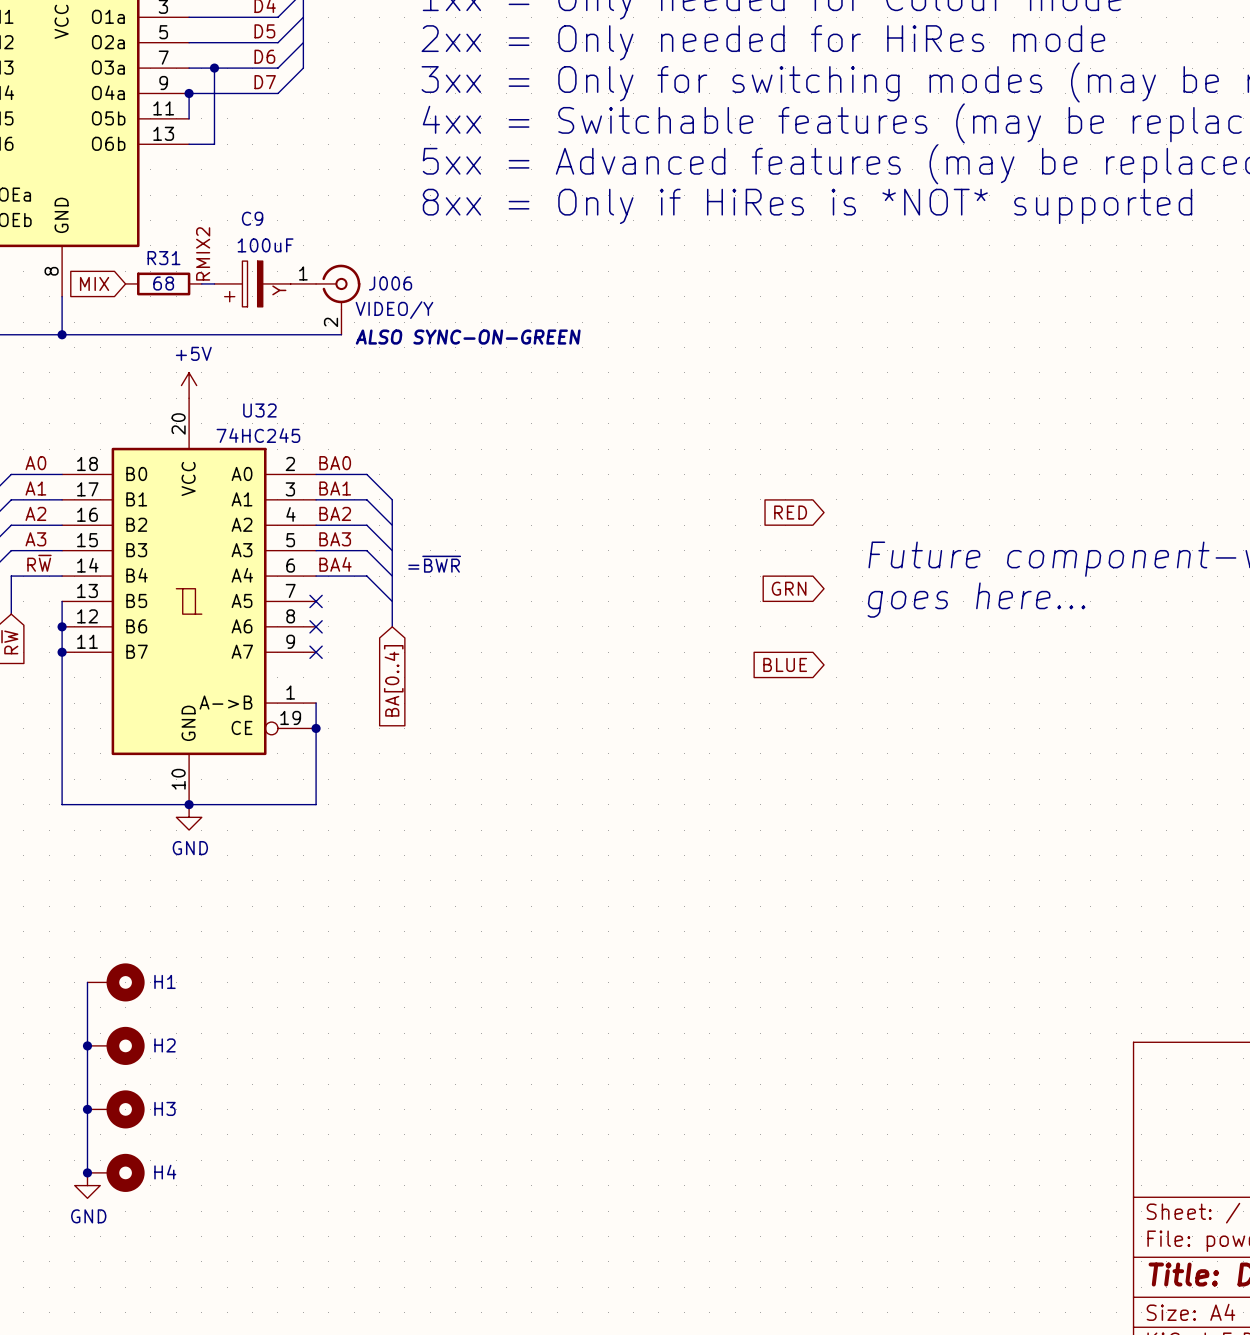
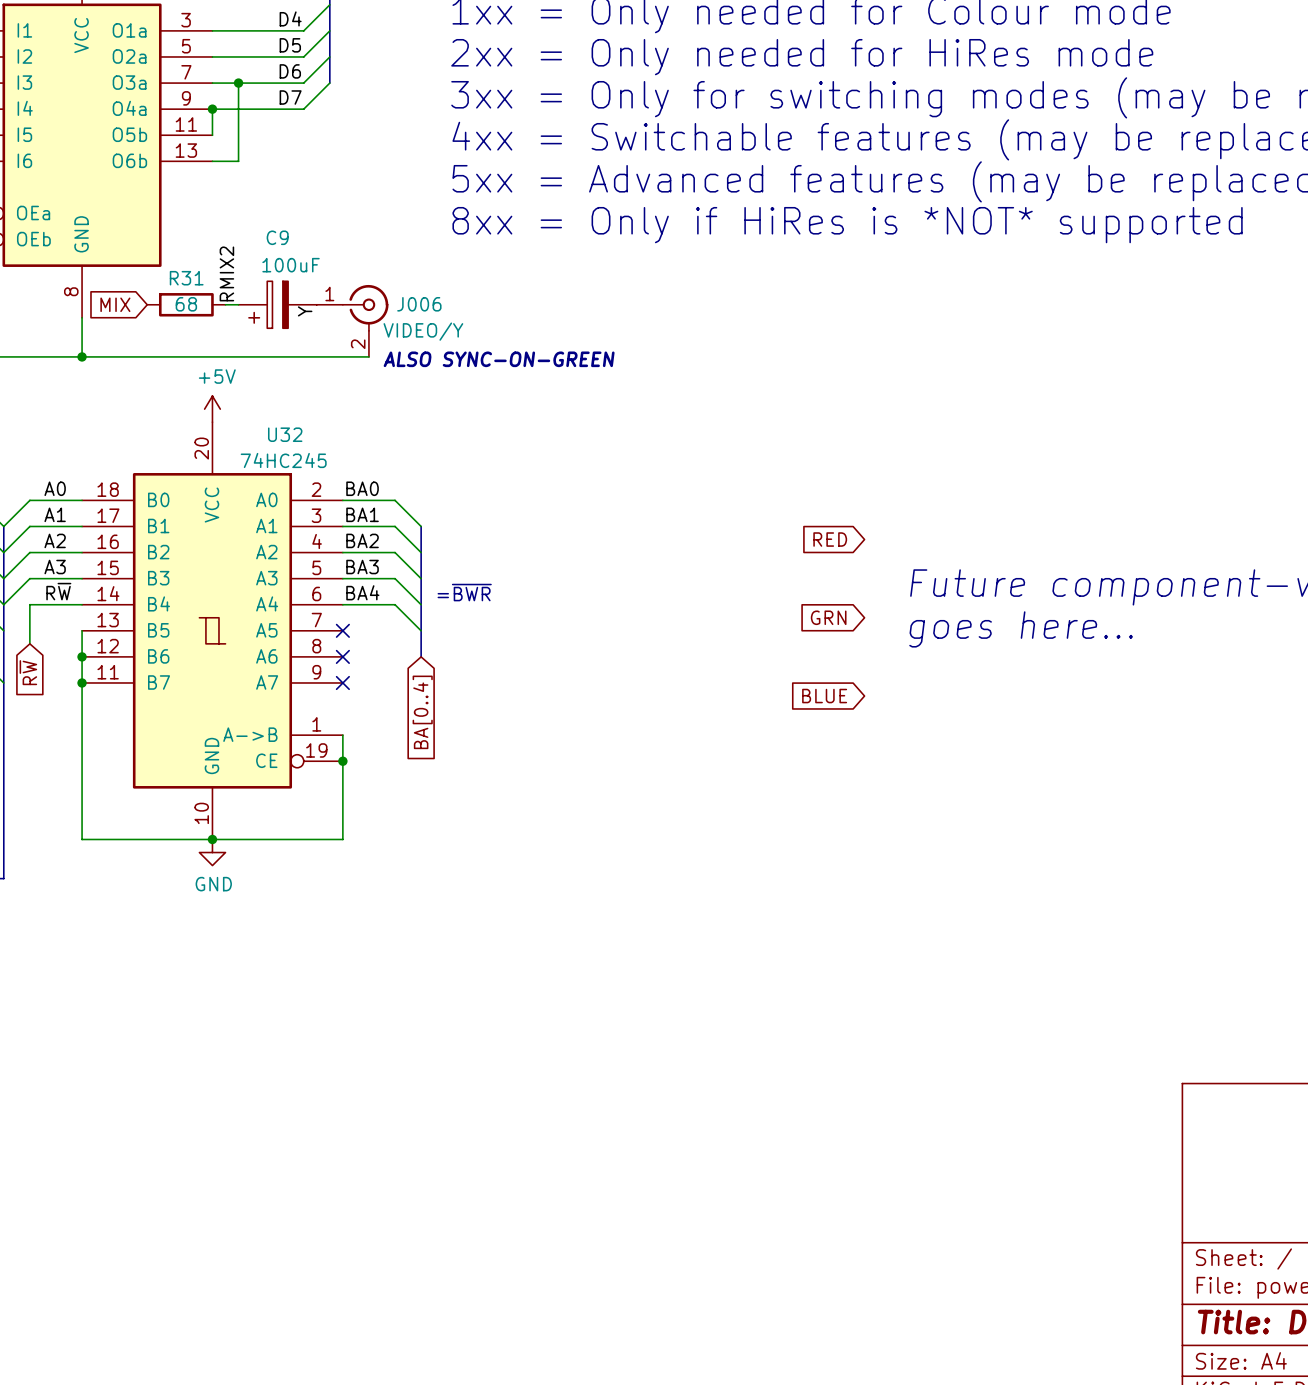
wire: (87, 982) (87, 1172) -> none
H1: (116, 982) -> none
junction: (87, 1045) -> none
H2: (116, 1045) -> none
junction: (87, 1109) -> none
H3: (116, 1109) -> none
junction: (87, 1172) -> none
H4: (116, 1172) -> none
power symbol: GND (87, 1185) -> none

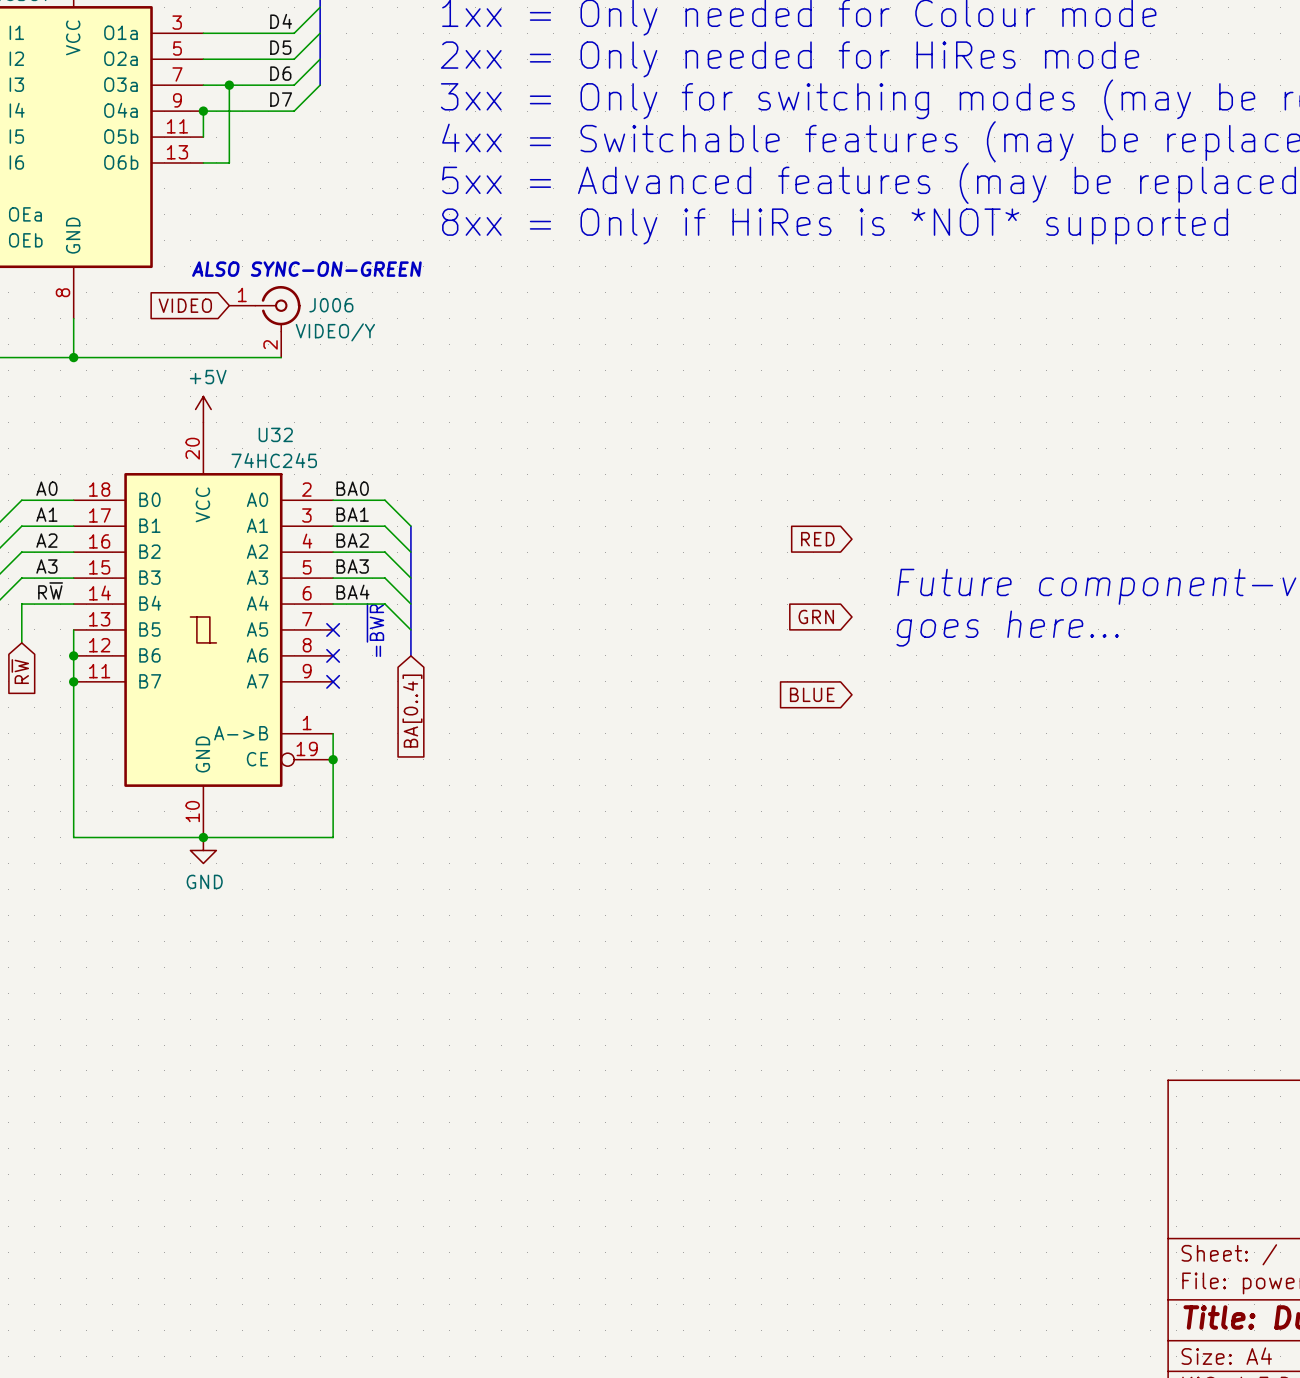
label: RMIX2 (226, 273) -> none
global label: MIX (115, 304) -> none
R31: 68 (186, 304) -> none
global label: none -> VIDEO (185, 305)
wire: (225, 304) (238, 304) -> none
C9: 100uF (277, 304) -> none
label: Y (305, 311) -> none
J006 position: (352, 320) -> (265, 321)
wire: (290, 356) (368, 356) -> none
text position: ALSO SYNC-ON-GREEN (499, 359) -> ALSO SYNC-ON-GREEN (306, 269)
text rotation: 0° (464, 592) -> 90° counterclockwise (375, 630)
text position: =~{BWR} (464, 592) -> =~{BWR} (375, 630)

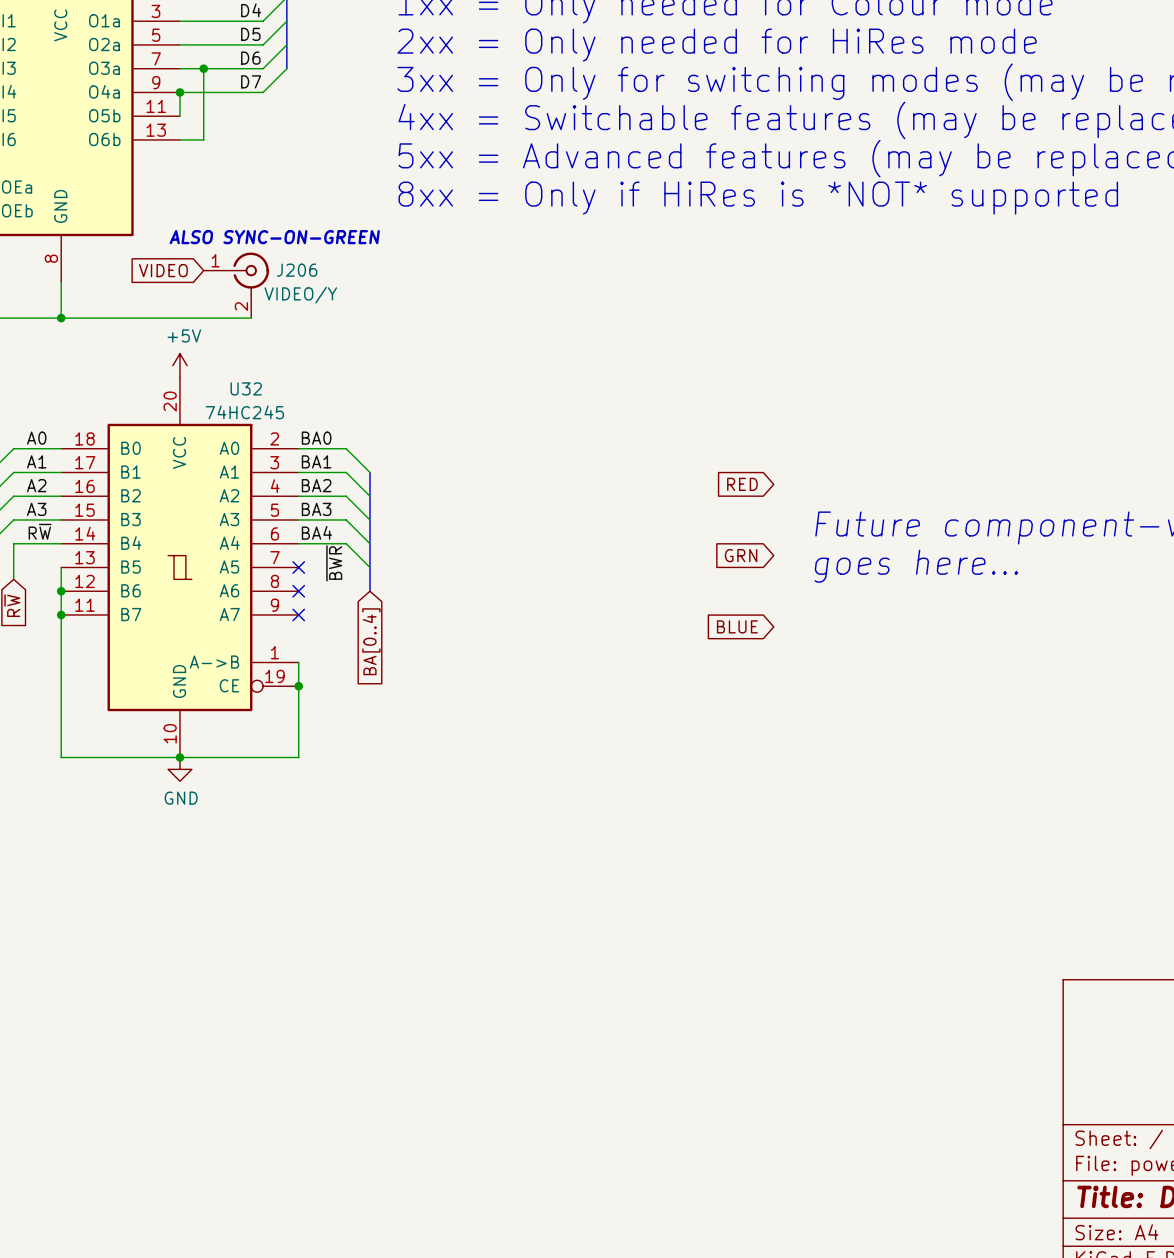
J006 name: J006 (331, 305) -> J206 (297, 270)
label: none -> ~{BWR} (334, 563)
text: =~{BWR} (375, 630) -> none

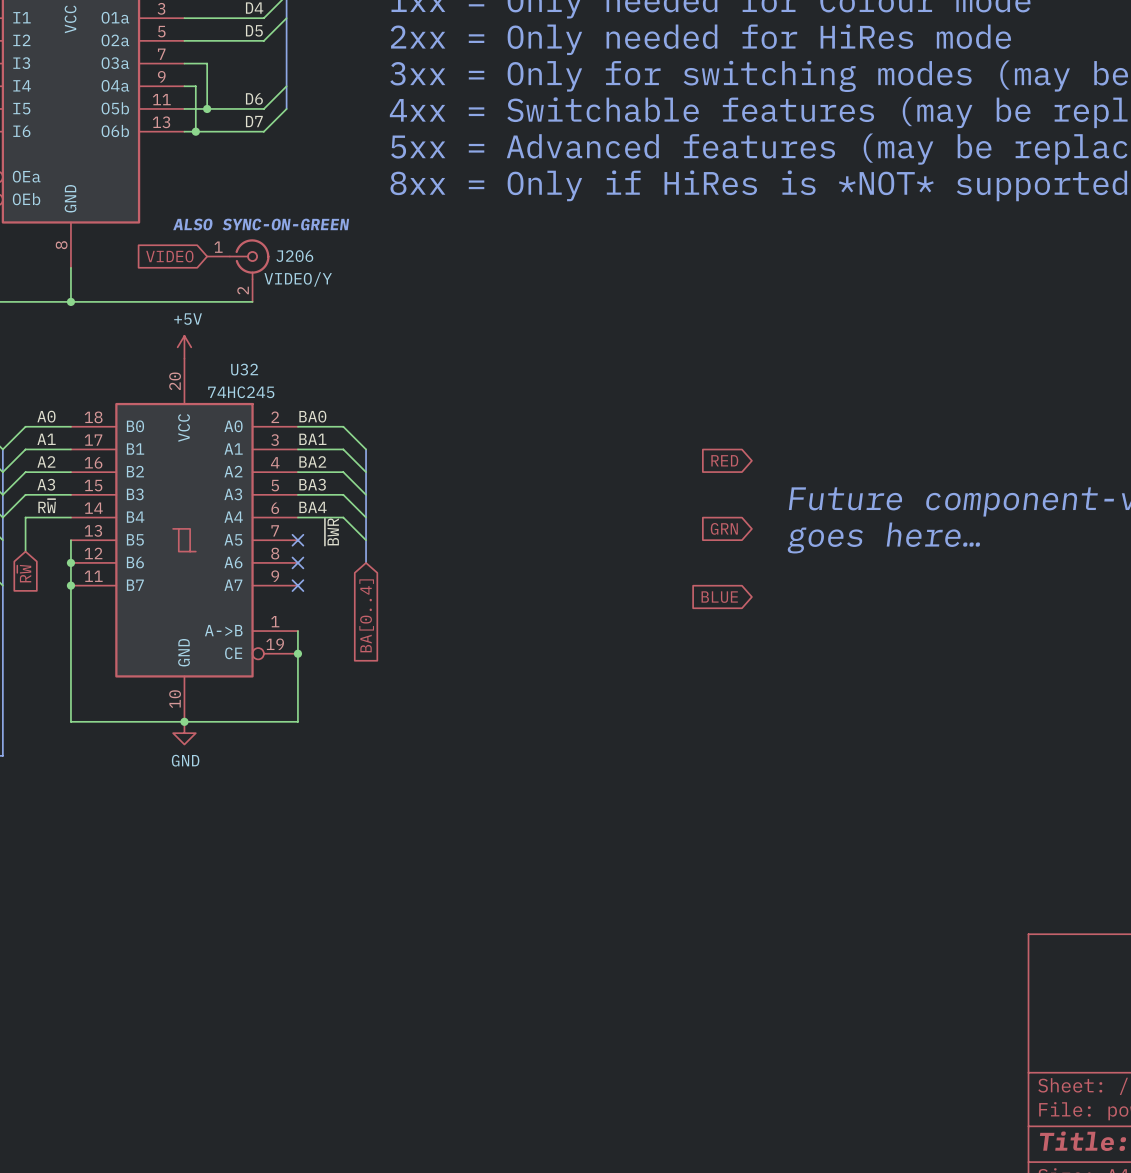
wire: (286, 44) (263, 68) (203, 68) -> none
label position: D6 (250, 58) -> D6 (254, 98)
junction: (203, 68) -> none
wire: (286, 68) (263, 92) (191, 92) -> (195, 131) (195, 86)
bus: none -> (286, 63) (286, 108)
label position: D7 (251, 81) -> D7 (254, 121)
wire: (179, 92) (179, 116) -> (286, 86) (263, 108) (184, 108)
junction: (179, 92) -> none
wire: (203, 116) (203, 139) -> (286, 108) (263, 131) (207, 131)
junction: none -> (207, 108)
junction: none -> (195, 131)

